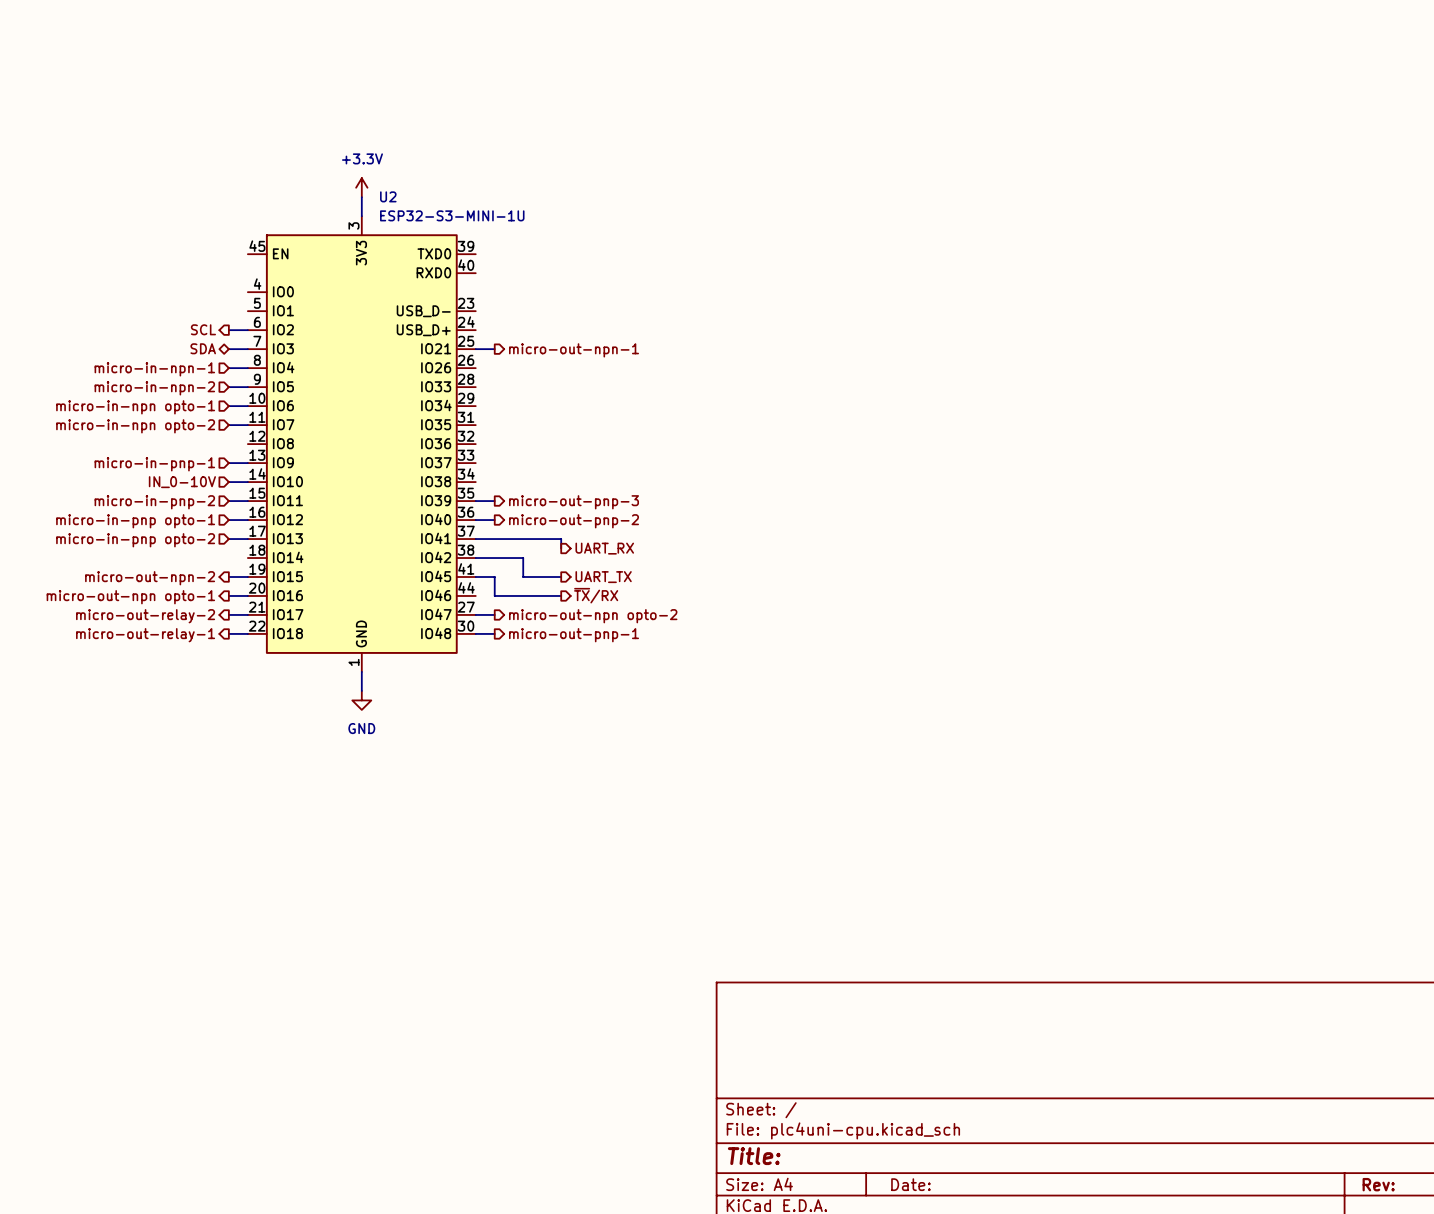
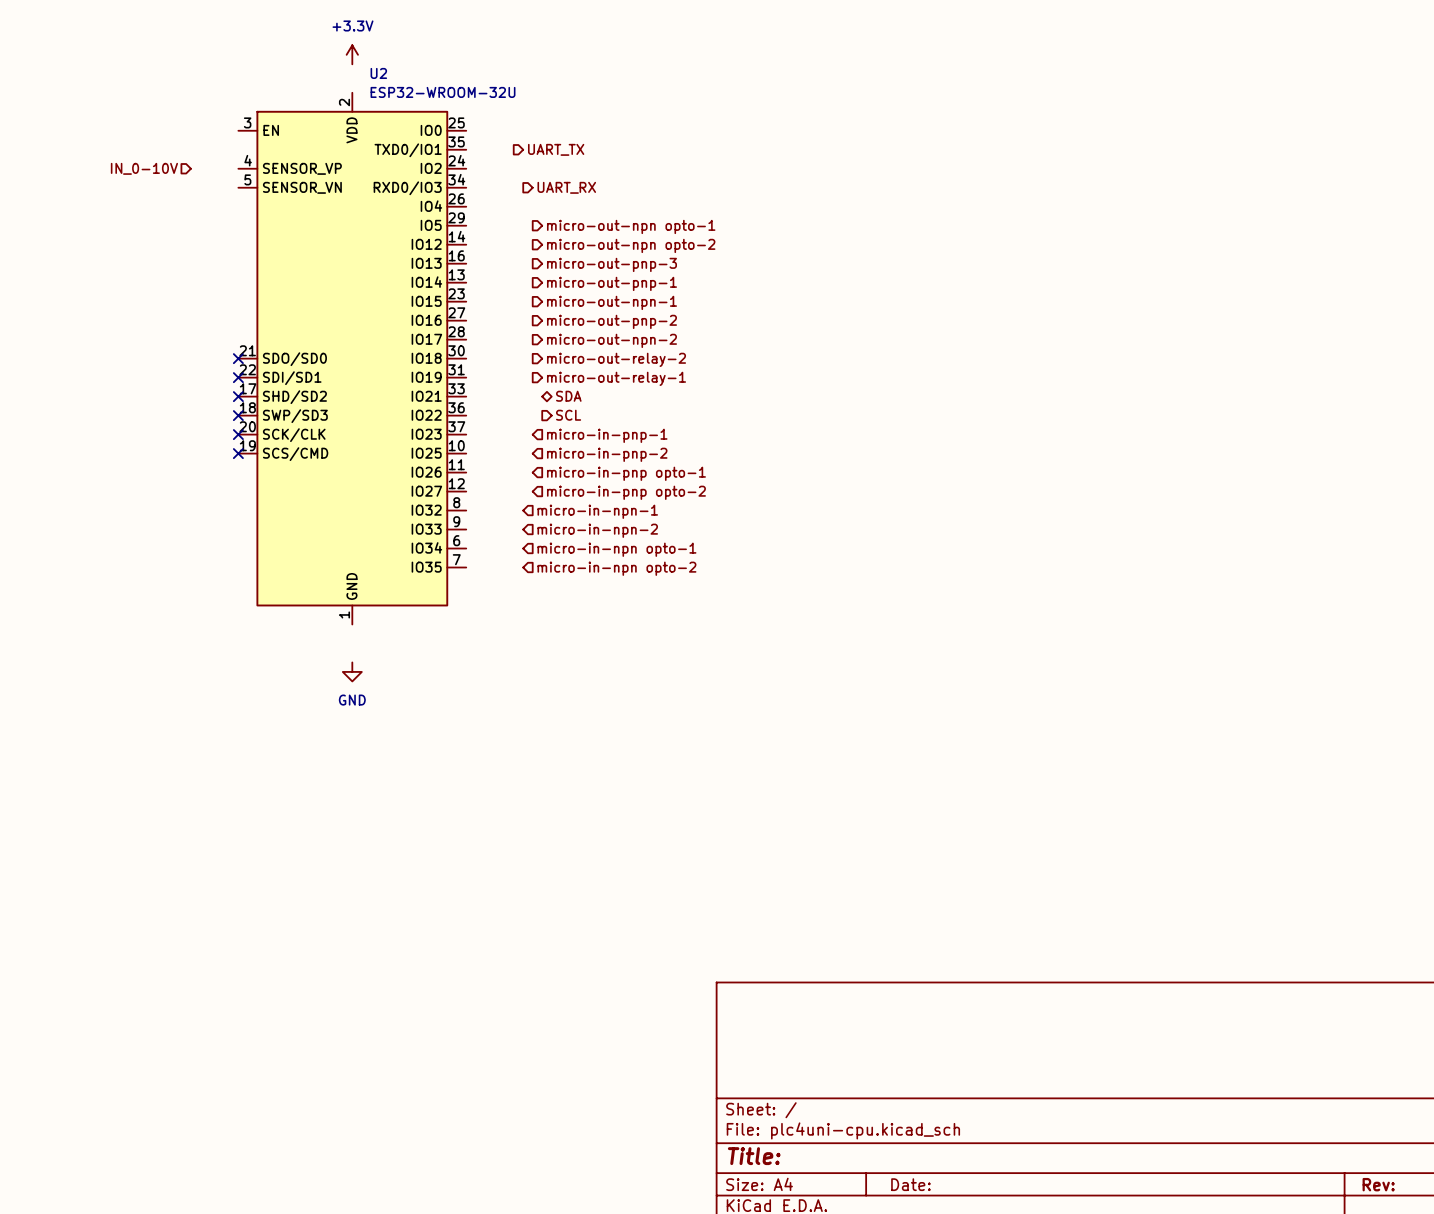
hierarchical label: none -> UART_TX (556, 149)
hierarchical label: none -> IN_0-10V (144, 168)
power symbol position: +3.3V (361, 187) -> +3.3V (352, 54)
hierarchical label: none -> UART_RX (566, 187)
U2 name position: U2 (388, 196) -> U2 (378, 73)
U2 value: ESP32-S3-MINI-1U (452, 215) -> ESP32-WROOM-32U (443, 92)
U2 symbol: [247, 216, 476, 672] -> [238, 92, 467, 625]
hierarchical label: none -> micro-out-npn opto-1 (631, 226)
hierarchical label: none -> micro-out-npn opto-2 (631, 245)
hierarchical label: none -> micro-out-pnp-3 (611, 264)
hierarchical label: none -> micro-out-pnp-1 (611, 283)
hierarchical label: none -> micro-out-pnp-2 (611, 321)
hierarchical label: SCL (203, 329) -> none
wire: (228, 330) (247, 330) -> none
hierarchical label: none -> micro-out-npn-2 (611, 340)
hierarchical label: SDA (203, 348) -> none
wire: (228, 349) (247, 349) -> none
wire: (475, 349) (494, 349) -> none
hierarchical label position: micro-out-npn-1 (574, 350) -> micro-out-npn-1 (611, 302)
no-connect mark: none -> (238, 358)
hierarchical label: none -> micro-out-relay-2 (616, 359)
wire: (228, 368) (247, 368) -> none
hierarchical label: micro-in-npn-1 (154, 369) -> none
no-connect mark: none -> (238, 377)
hierarchical label: none -> micro-out-relay-1 (616, 378)
wire: (228, 387) (247, 387) -> none
hierarchical label: micro-in-npn-2 (154, 388) -> none
no-connect mark: none -> (238, 396)
hierarchical label: none -> SDA (568, 396)
wire: (228, 406) (247, 406) -> none
hierarchical label: micro-in-npn opto-1 (135, 407) -> none
no-connect mark: none -> (238, 415)
hierarchical label: none -> SCL (568, 415)
wire: (228, 425) (247, 425) -> none
hierarchical label: micro-in-npn opto-2 (135, 426) -> none
no-connect mark: none -> (238, 434)
hierarchical label: none -> micro-in-pnp-1 (607, 435)
no-connect mark: none -> (238, 453)
hierarchical label: none -> micro-in-pnp-2 (607, 454)
wire: (228, 463) (247, 463) -> none
hierarchical label: micro-in-pnp-1 (154, 464) -> none
hierarchical label: none -> micro-in-pnp opto-1 (626, 473)
hierarchical label: IN_0-10V (182, 482) -> none
wire: (228, 482) (247, 482) -> none
hierarchical label: none -> micro-in-pnp opto-2 (626, 492)
wire: (228, 501) (247, 501) -> none
wire: (475, 501) (494, 501) -> none
hierarchical label: micro-in-pnp-2 (154, 502) -> none
hierarchical label: micro-out-pnp-3 (574, 502) -> none
hierarchical label: none -> micro-in-npn-1 (597, 511)
wire: (228, 520) (247, 520) -> none
wire: (475, 520) (494, 520) -> none
hierarchical label: micro-in-pnp opto-1 (135, 521) -> none
hierarchical label: micro-out-pnp-2 (574, 521) -> none
hierarchical label: none -> micro-in-npn-2 (597, 530)
wire: (228, 539) (247, 539) -> none
wire: (475, 539) (561, 539) (561, 548) -> none
hierarchical label: micro-in-pnp opto-2 (135, 540) -> none
hierarchical label: UART_RX (604, 548) -> none
hierarchical label: none -> micro-in-npn opto-1 (616, 549)
wire: (475, 558) (523, 558) (523, 577) (561, 577) -> none
hierarchical label: none -> micro-in-npn opto-2 (616, 568)
wire: (228, 577) (247, 577) -> none
wire: (475, 577) (494, 577) (494, 595) (561, 595) -> none
hierarchical label: UART_TX (603, 577) -> none
hierarchical label: micro-out-npn-2 (150, 578) -> none
wire: (228, 595) (247, 595) -> none
hierarchical label: ~{TX}/RX (596, 595) -> none
hierarchical label: micro-out-npn opto-1 (130, 597) -> none
wire: (228, 614) (247, 614) -> none
wire: (475, 614) (494, 614) -> none
hierarchical label: micro-out-relay-2 (145, 616) -> none
hierarchical label: micro-out-npn opto-2 (593, 616) -> none
wire: (228, 633) (247, 633) -> none
wire: (475, 633) (494, 633) -> none
hierarchical label: micro-out-relay-1 (145, 635) -> none
hierarchical label: micro-out-pnp-1 (574, 635) -> none
wire: (361, 671) (361, 690) -> none
power symbol position: GND (361, 700) -> GND (352, 671)

